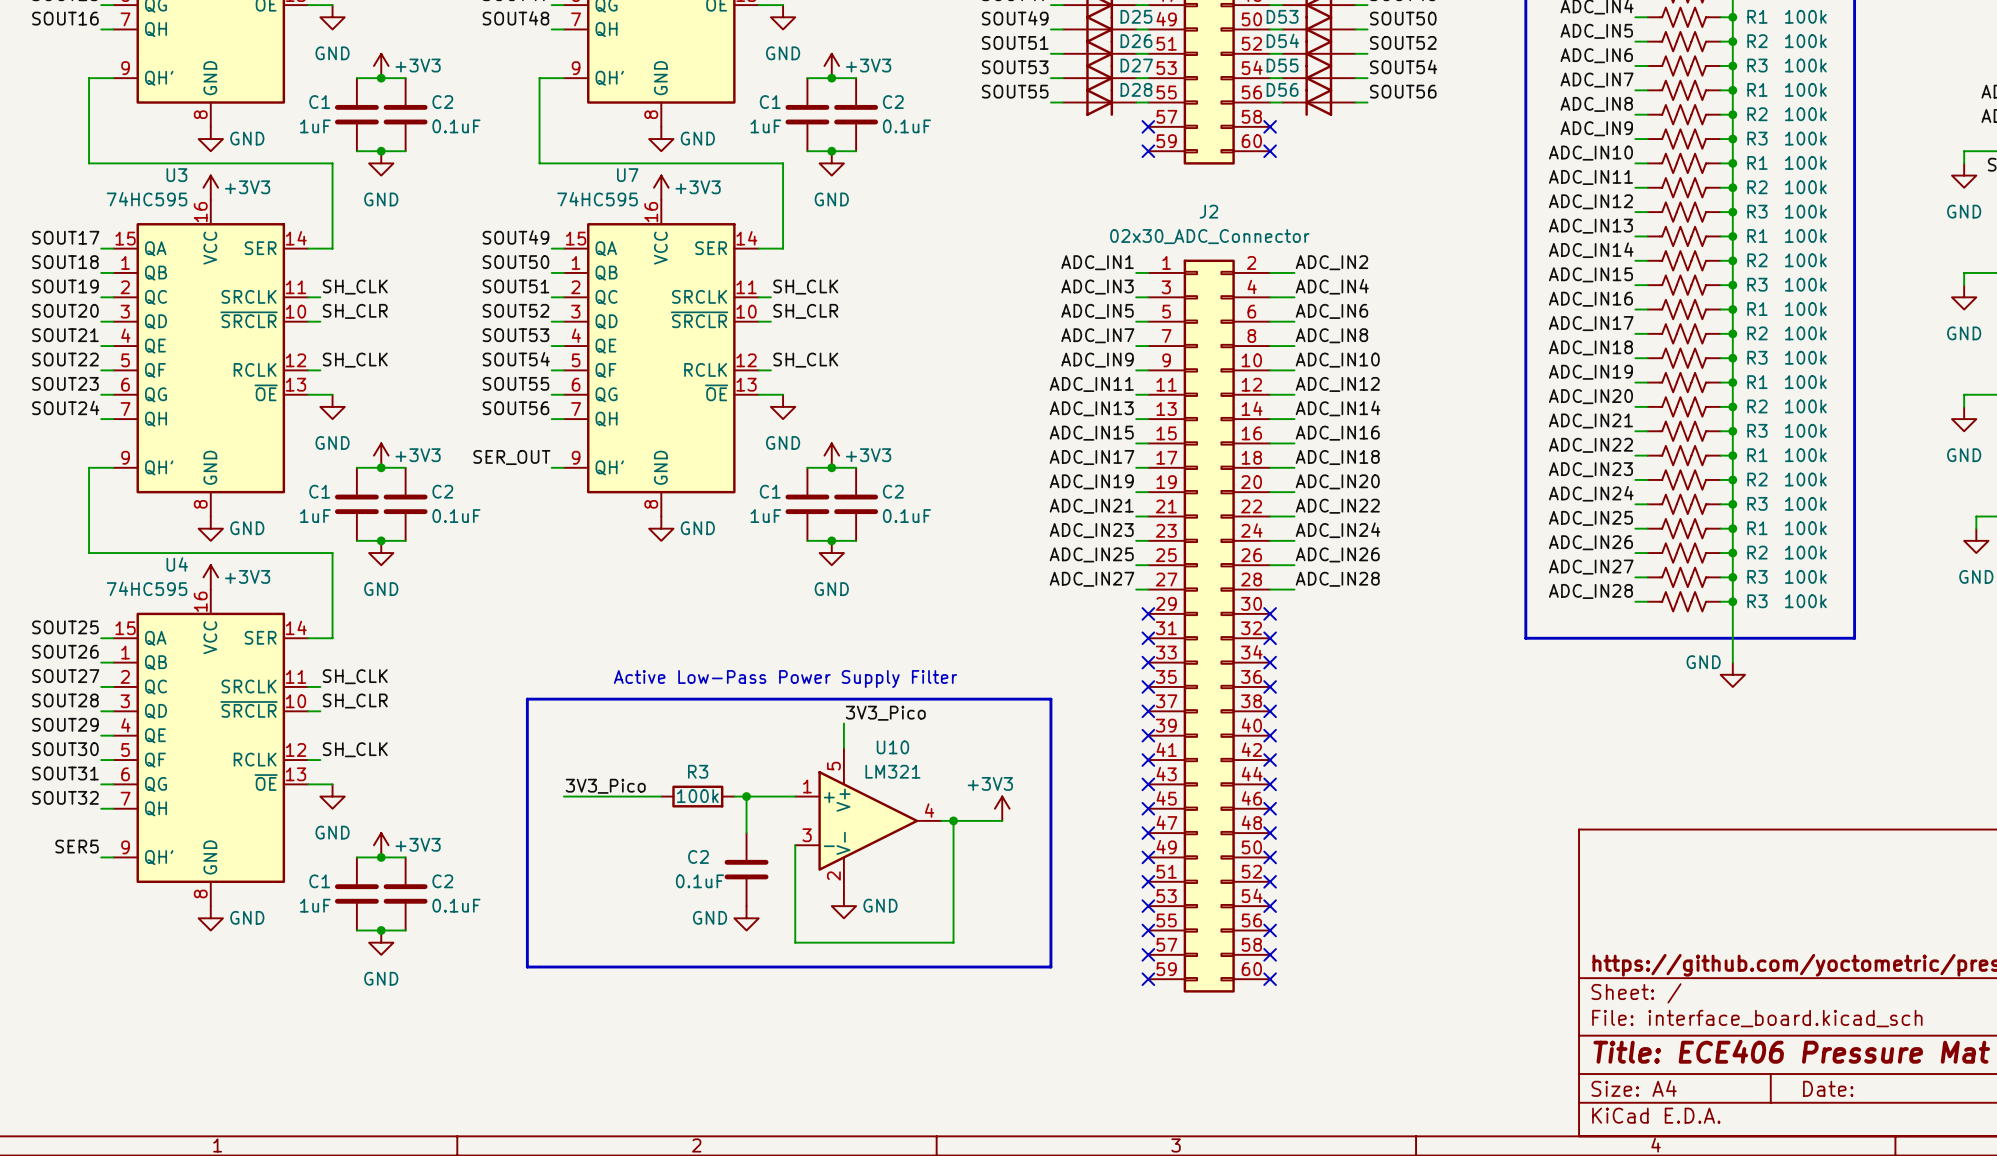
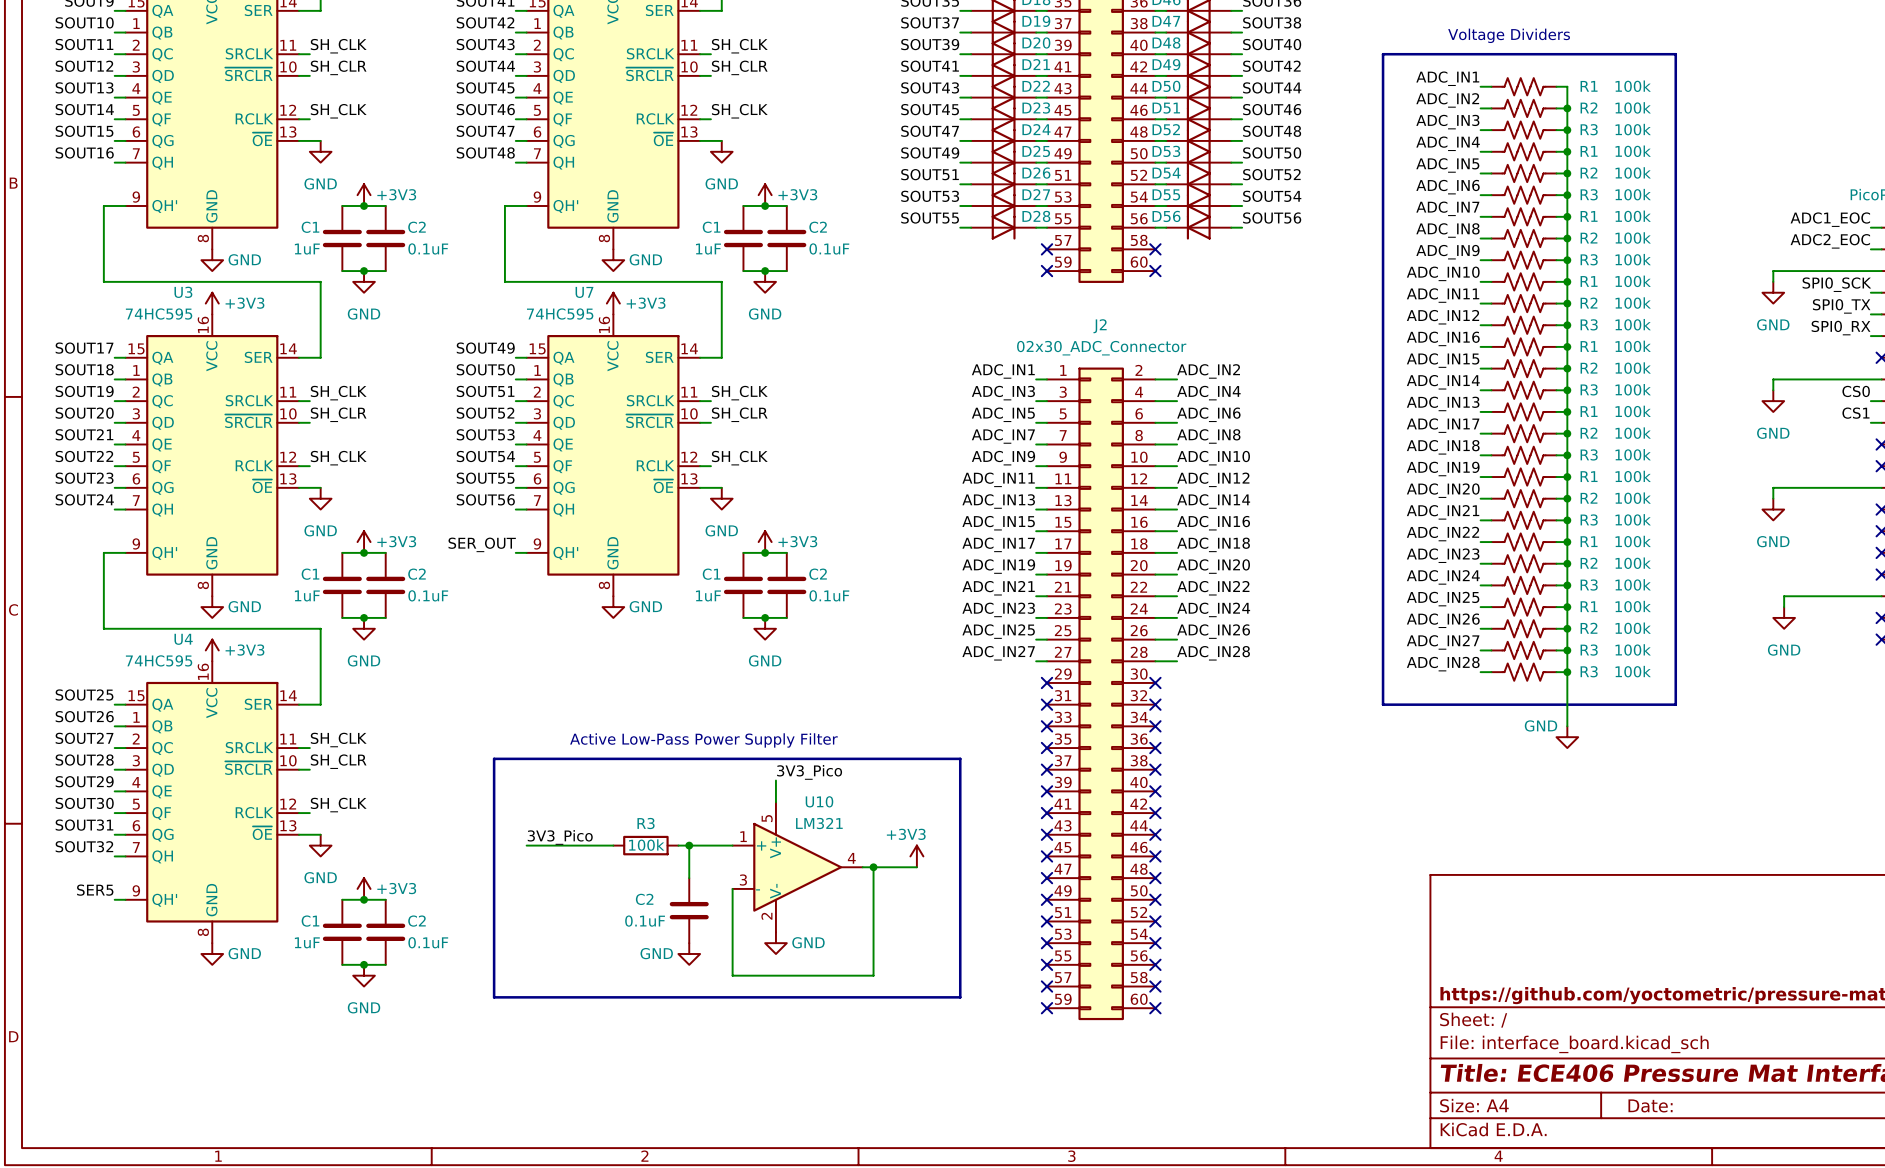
label: ADC_IN13 (1590, 226) -> ADC_IN16 (1443, 338)
label: ADC_IN14 (1591, 250) -> ADC_IN15 (1443, 360)
label: ADC_IN15 (1590, 274) -> ADC_IN14 (1443, 382)
label: ADC_IN16 (1590, 299) -> ADC_IN13 (1443, 403)

